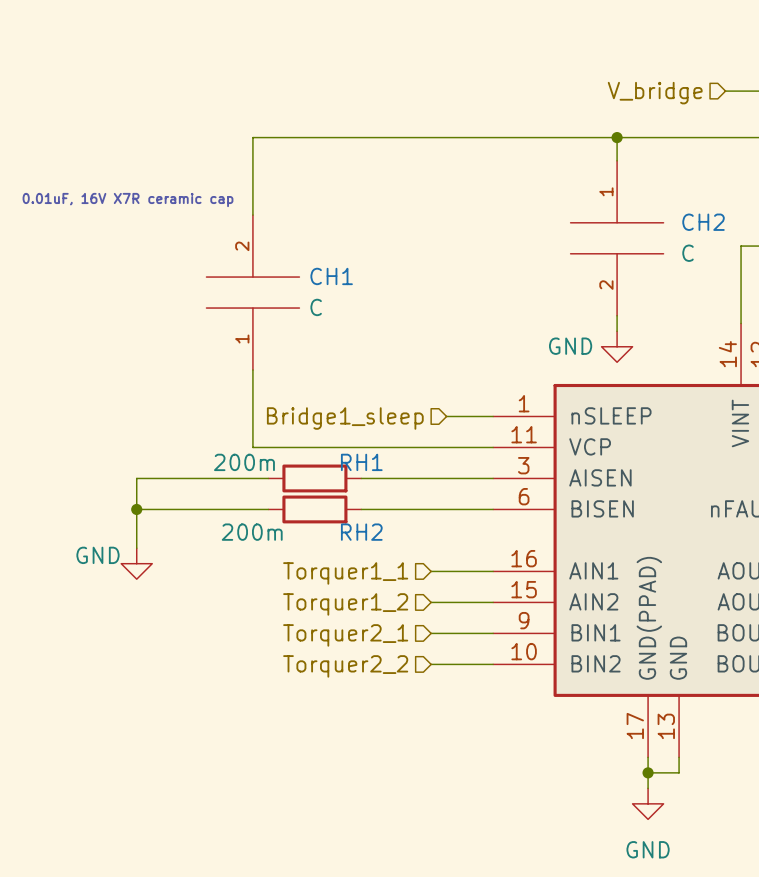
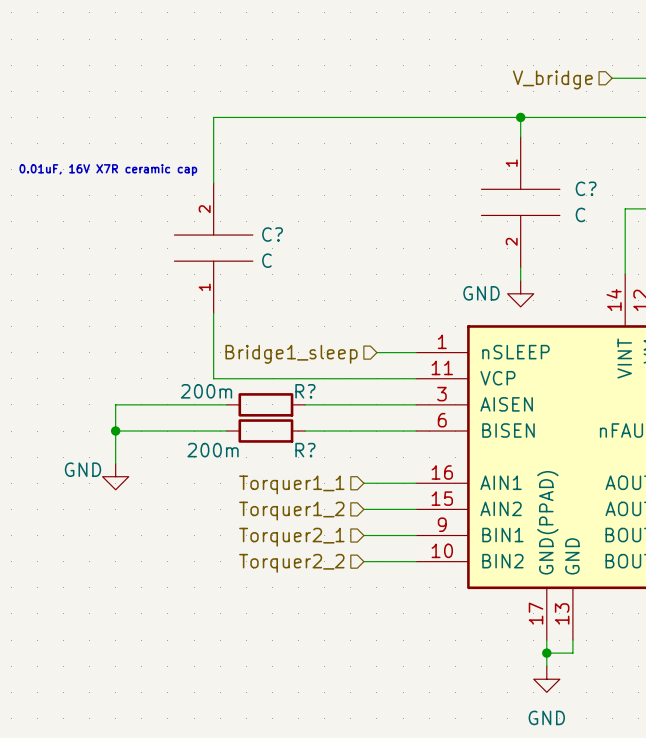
CH2 name: CH2 (703, 222) -> C? (586, 188)
CH1 name: CH1 (331, 276) -> C? (272, 234)
RH1 name: RH1 (361, 462) -> R? (305, 391)
RH2 name: RH2 (361, 532) -> R? (305, 450)

